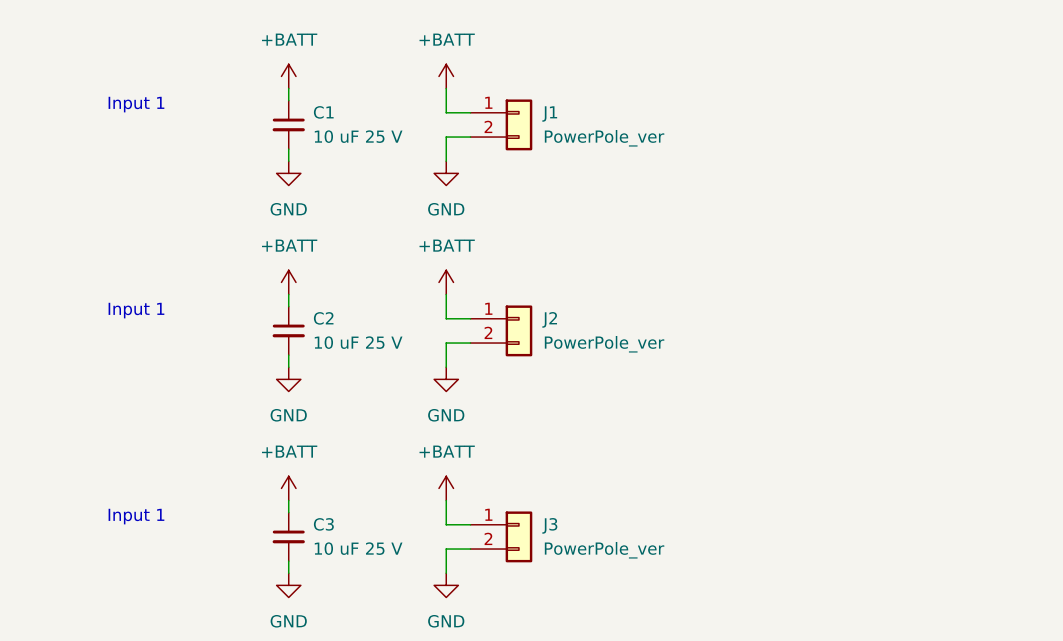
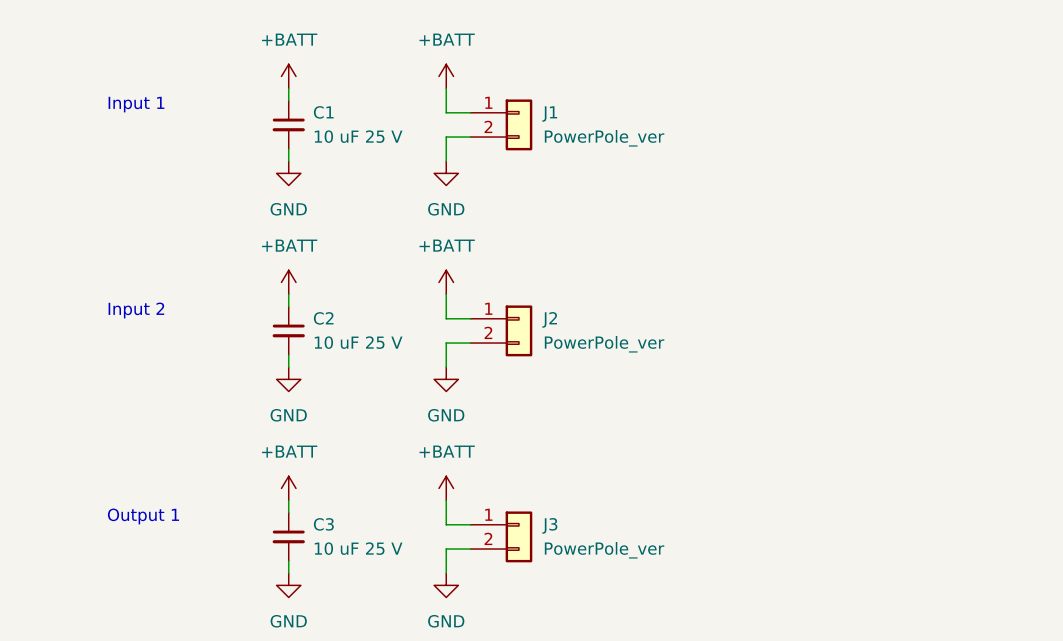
text: Input 1 (136, 310) -> Input 2 (136, 310)
text: Input 1 (136, 516) -> Output 1 (143, 516)

